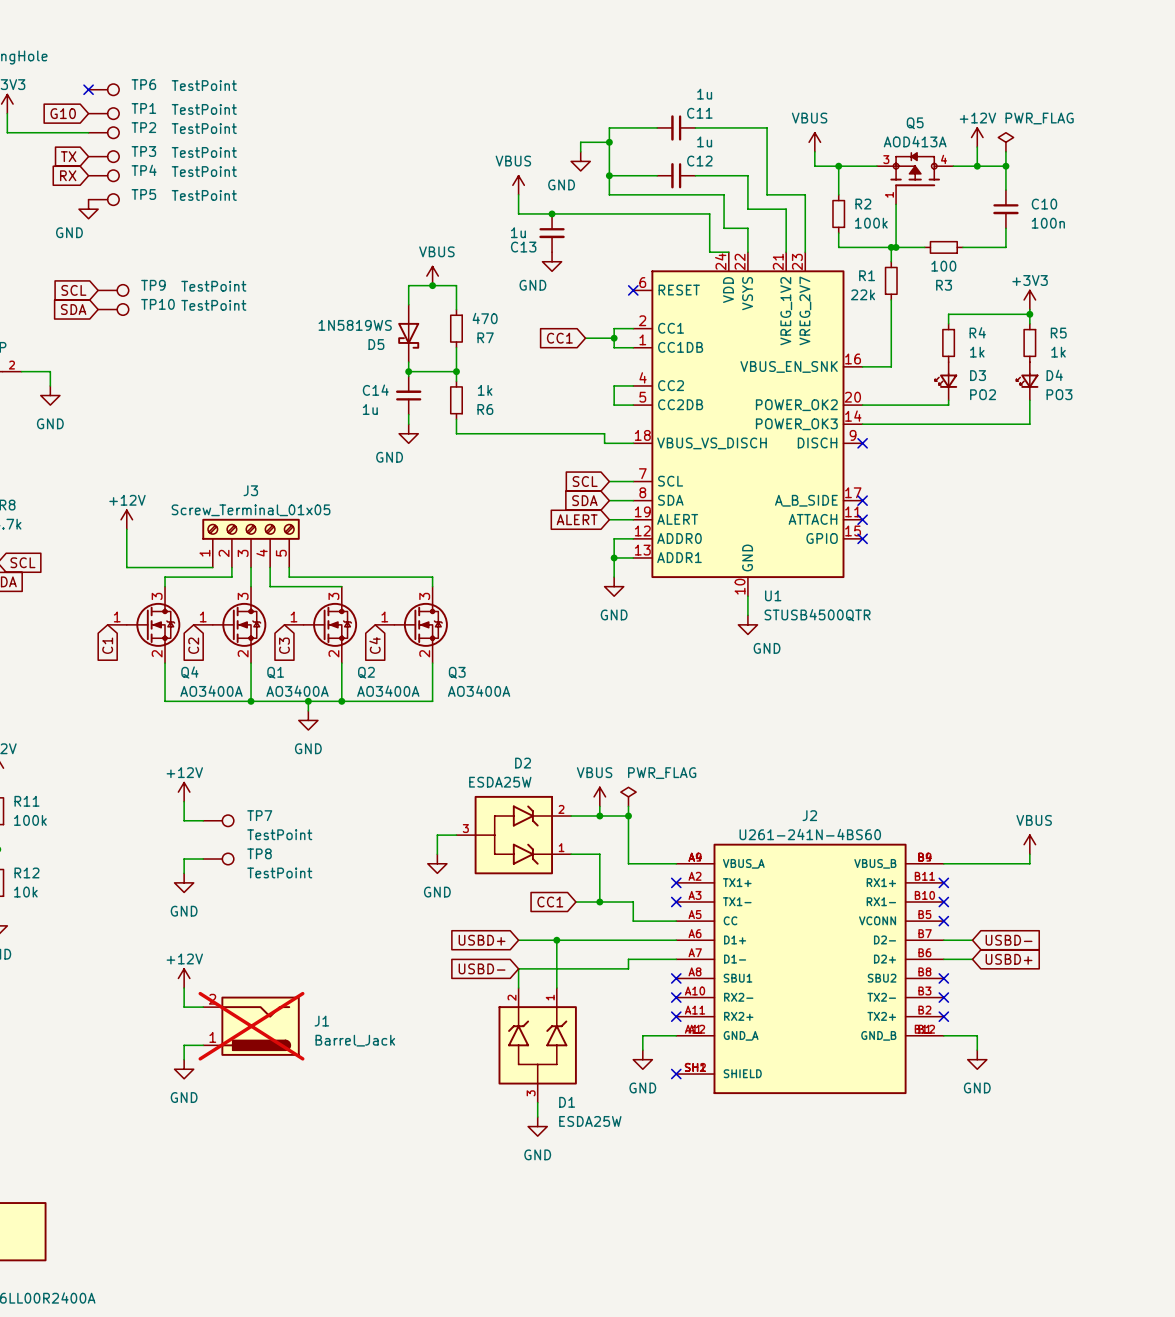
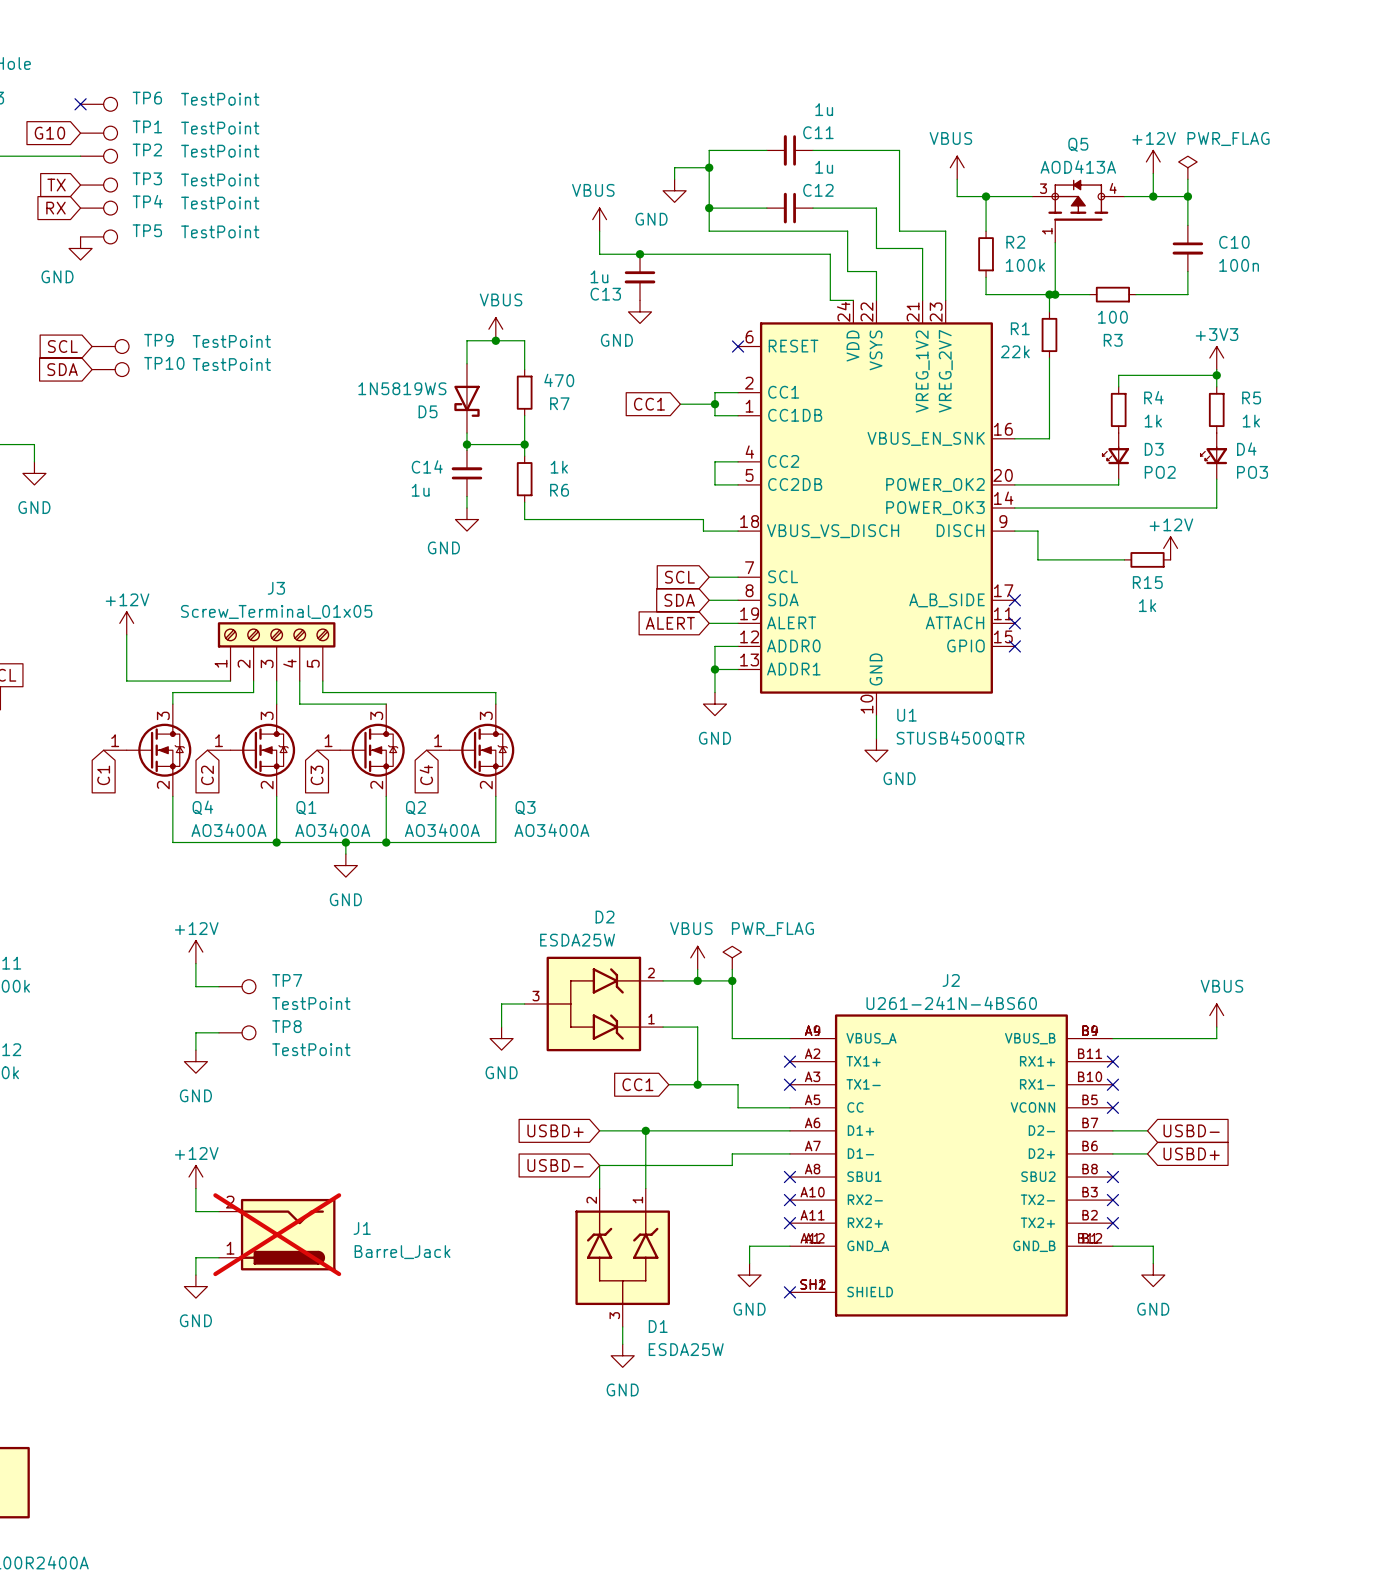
wire: none -> (1014, 531) (1037, 531) (1037, 559) (1124, 559)
no-connect mark: (862, 443) -> none
power symbol: none -> +12V (1170, 548)
R15: none -> 1k (1147, 559)

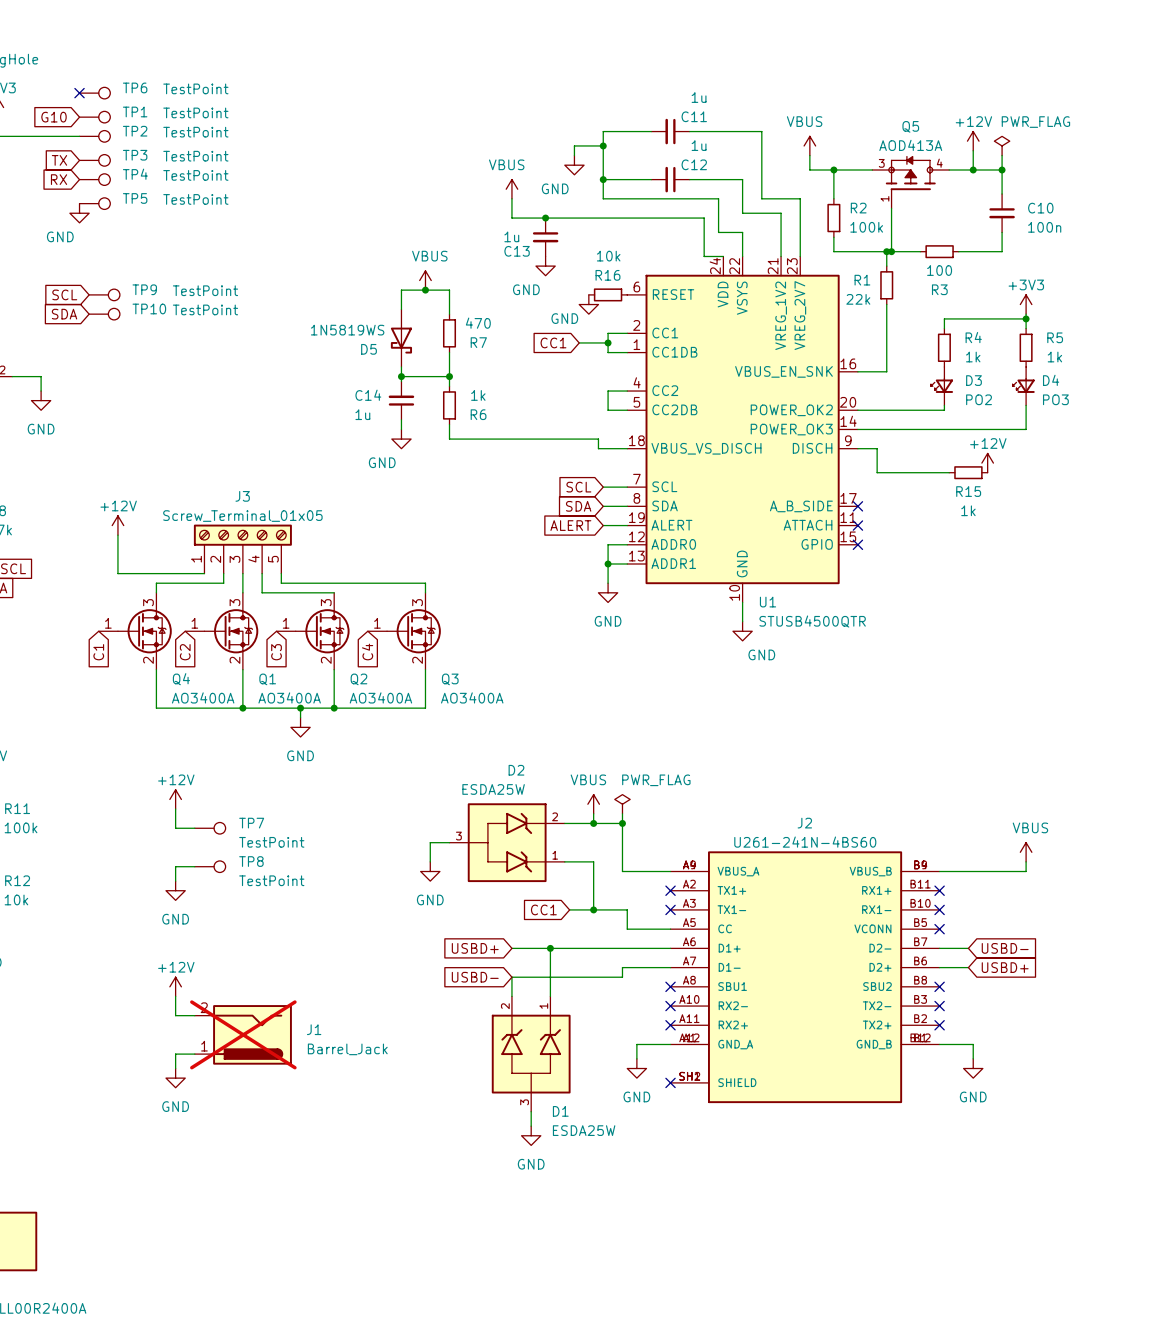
R16: none -> 10k (608, 294)
no-connect mark: (738, 346) -> none
power symbol: none -> GND (588, 304)

